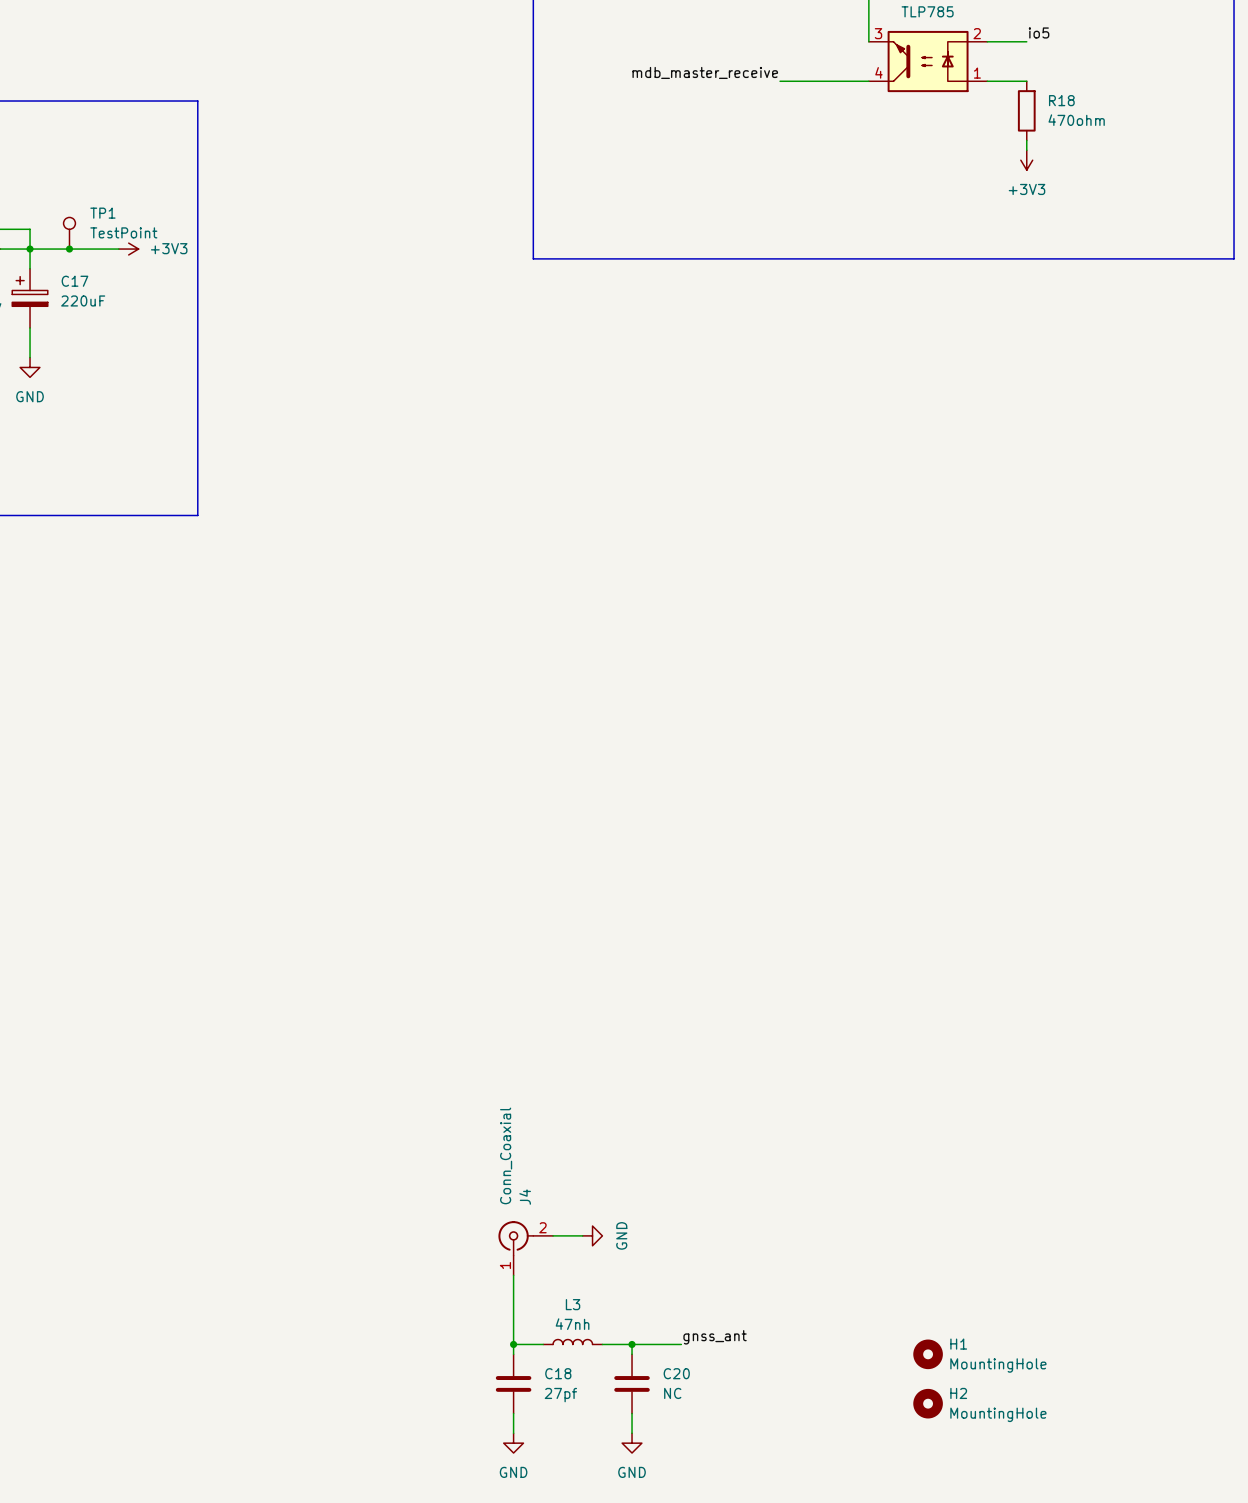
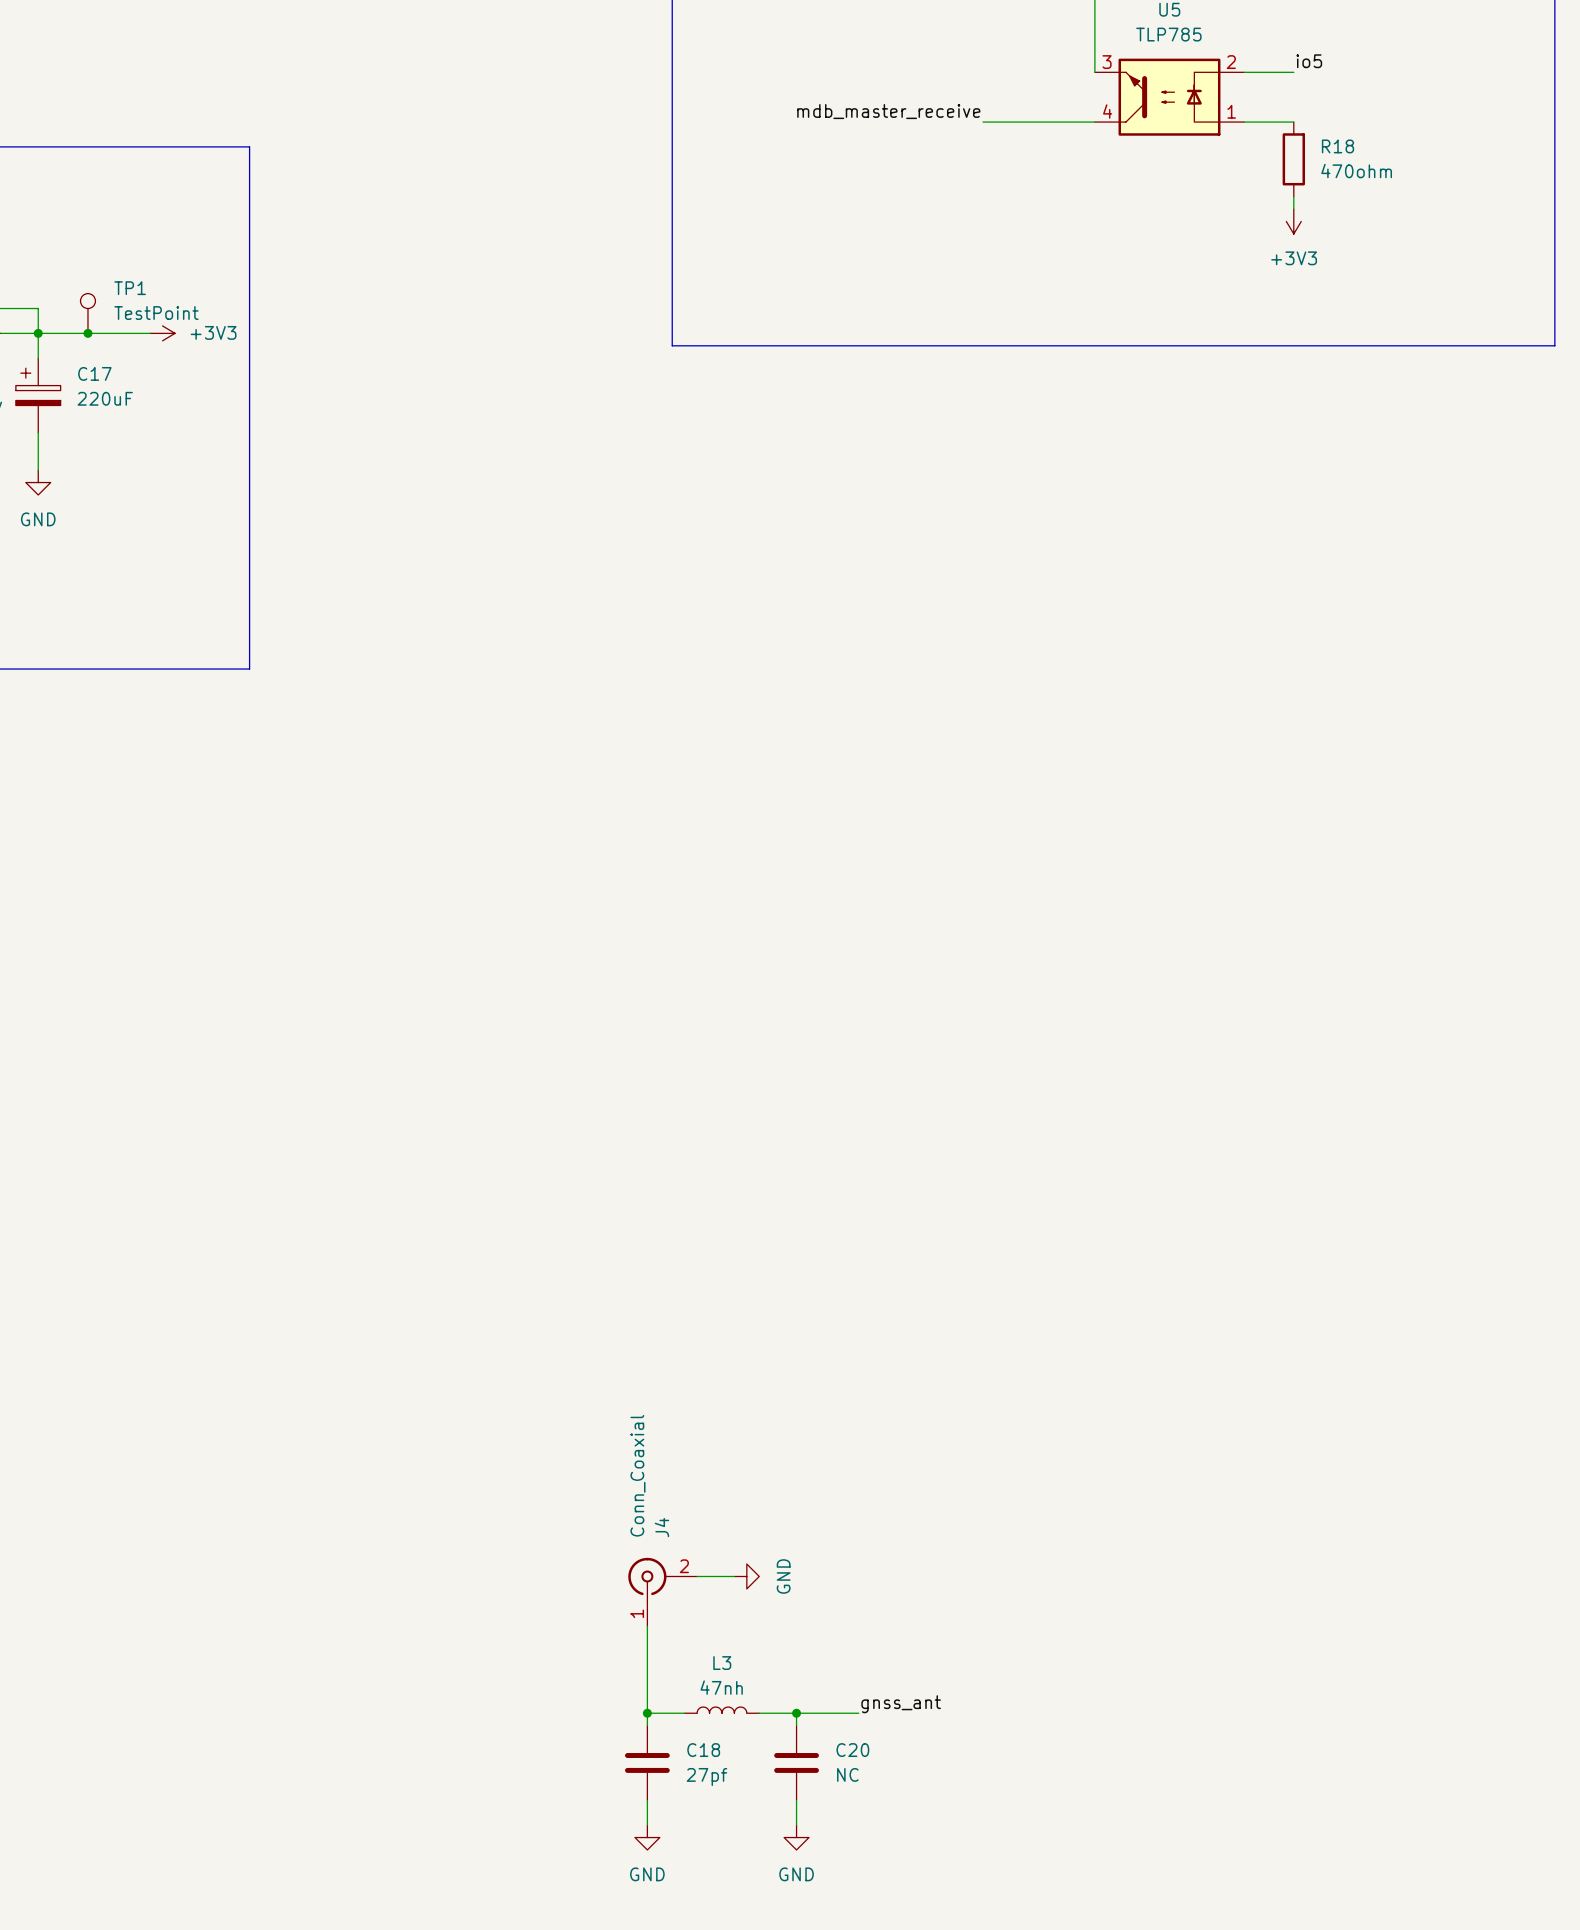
H1: MountingHole (928, 1354) -> none
H2: MountingHole (928, 1403) -> none

